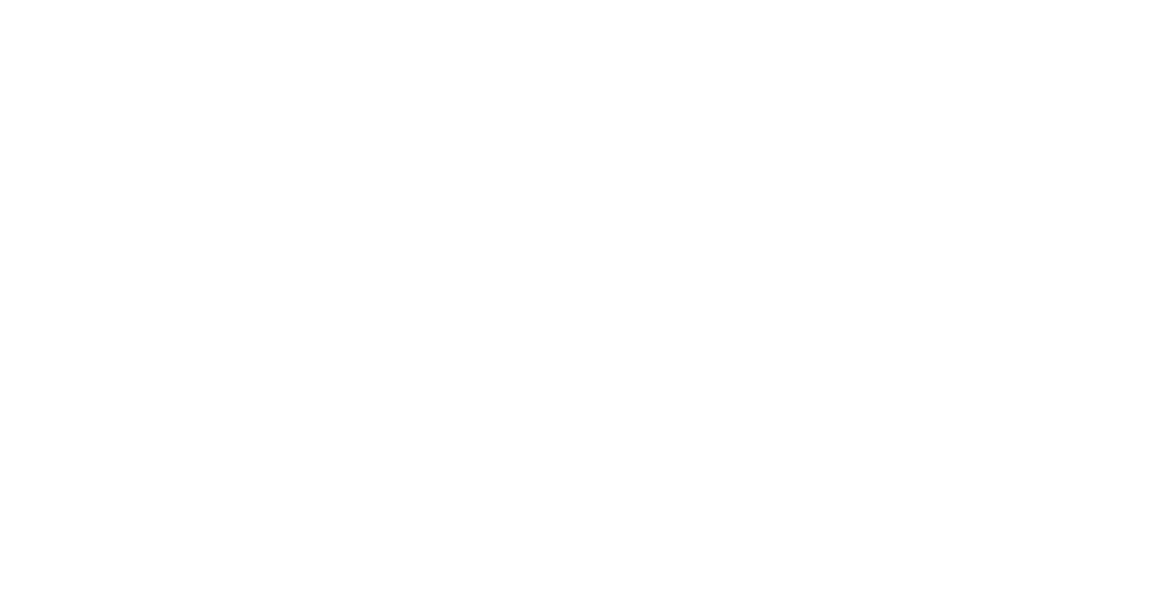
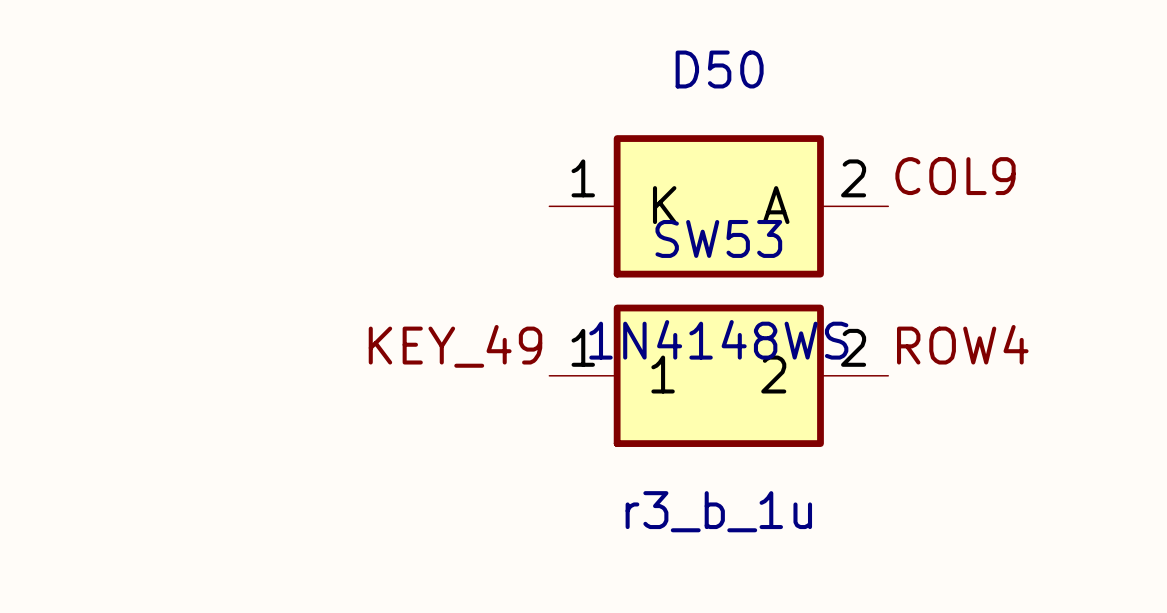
label: none -> COL9 (955, 176)
D50: none -> 1N4148WS (718, 206)
label: none -> ROW4 (962, 344)
label: none -> KEY_49 (455, 346)
SW53: none -> r3_b_1u (718, 375)

